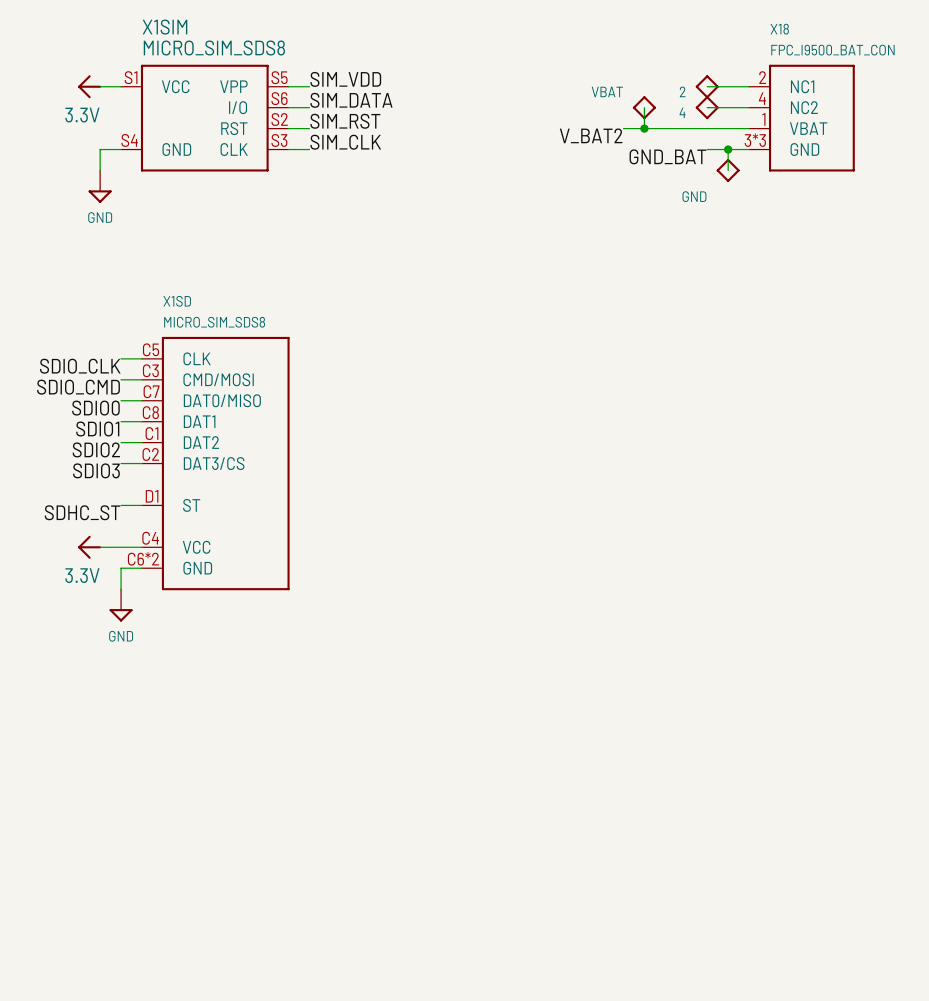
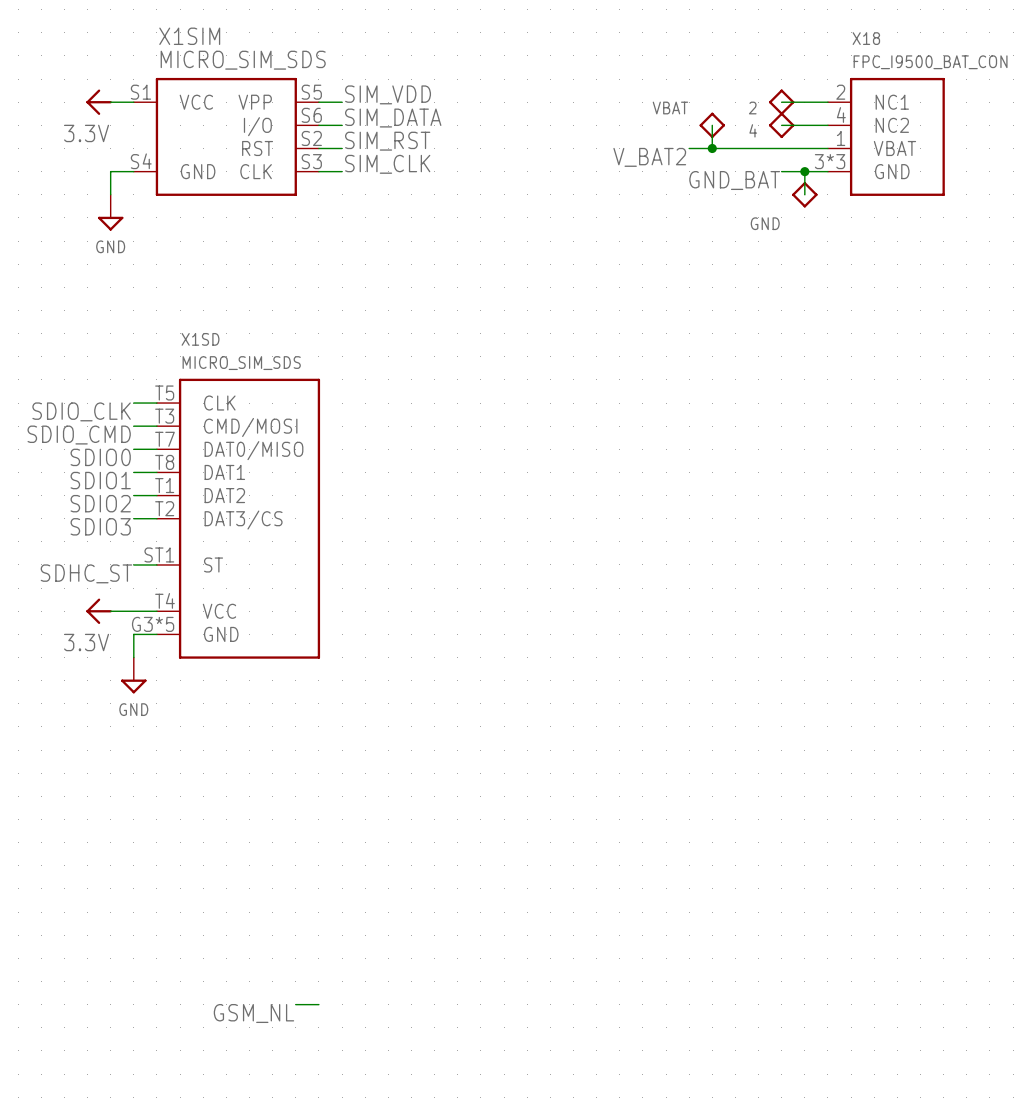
X1SIM value: MICRO_SIM_SDS8 (214, 47) -> MICRO_SIM_SDS (243, 60)
X1SD value: MICRO_SIM_SDS8 (214, 322) -> MICRO_SIM_SDS (241, 363)
X1SD symbol: [141, 336, 290, 591] -> [156, 378, 321, 659]
wire: none -> (295, 1004) (318, 1004)
label: none -> GSM_NL (253, 1013)

